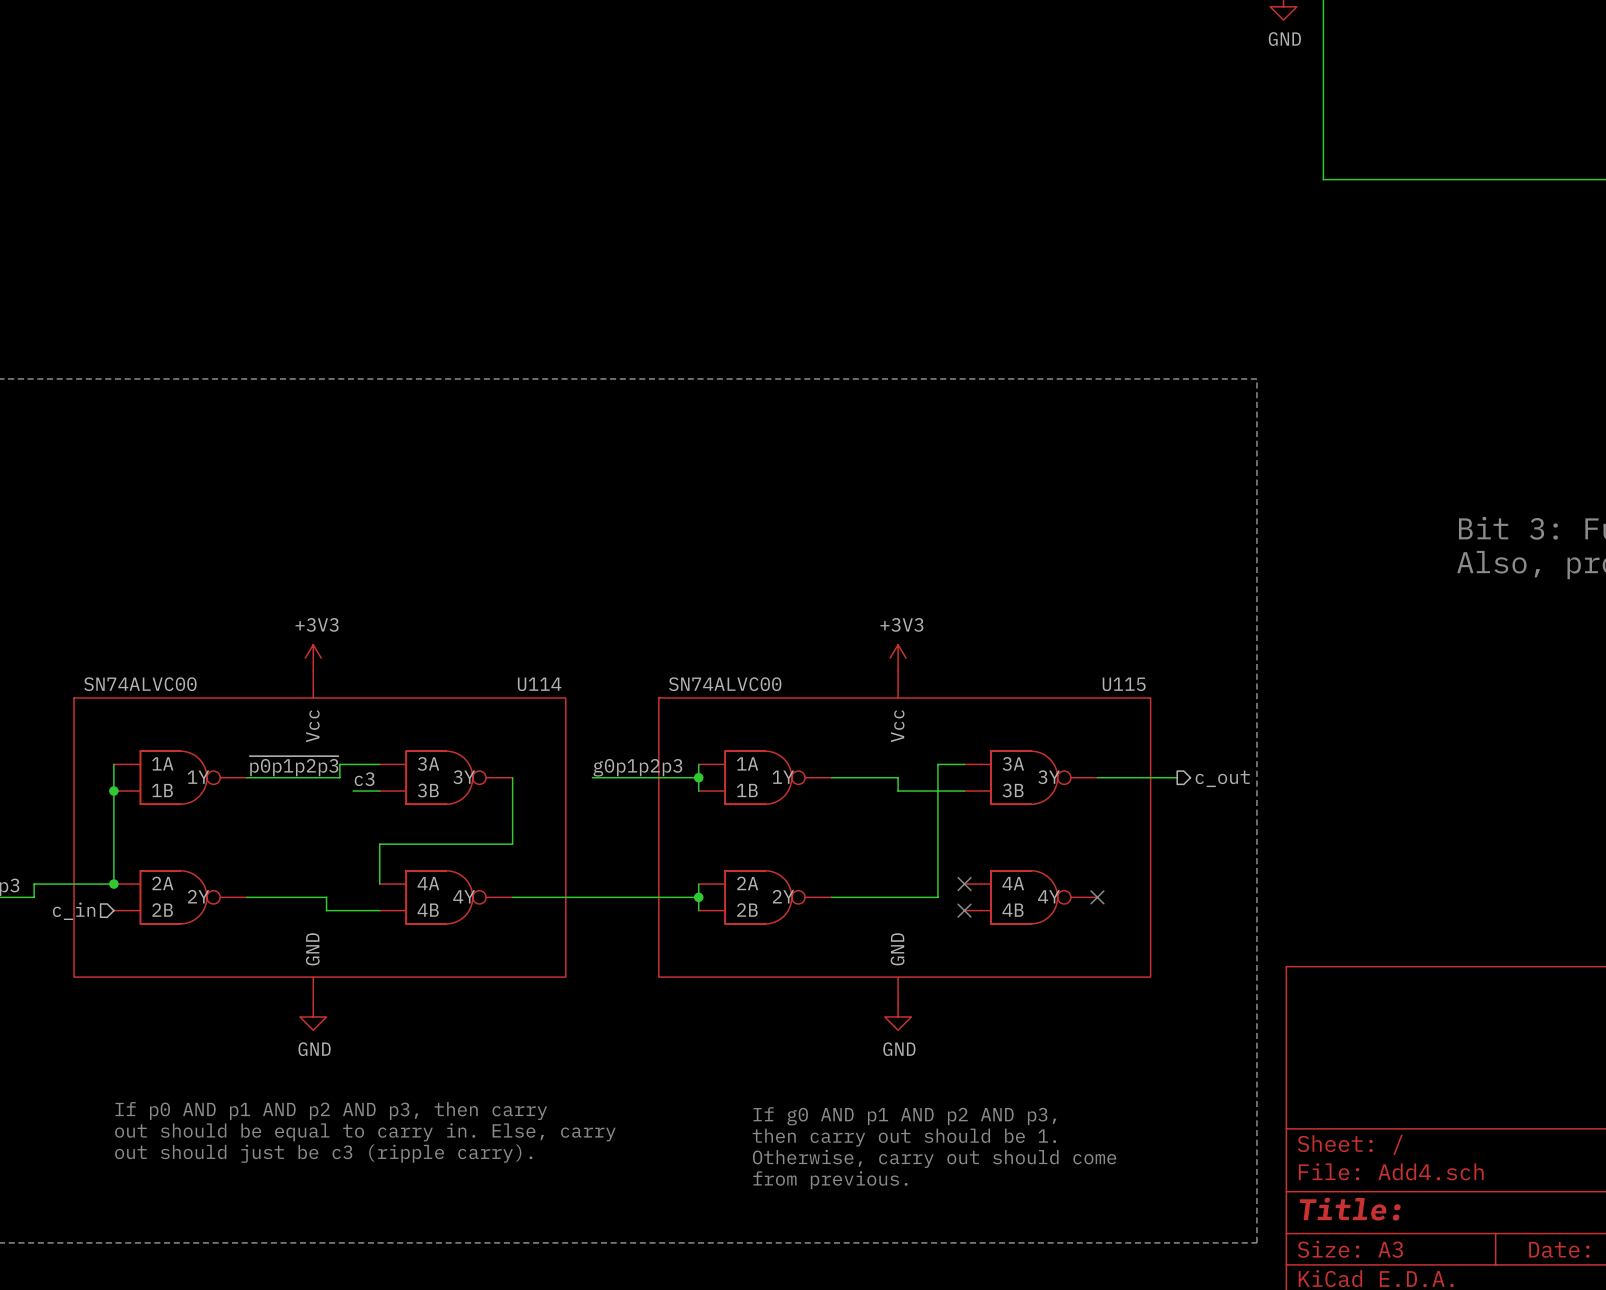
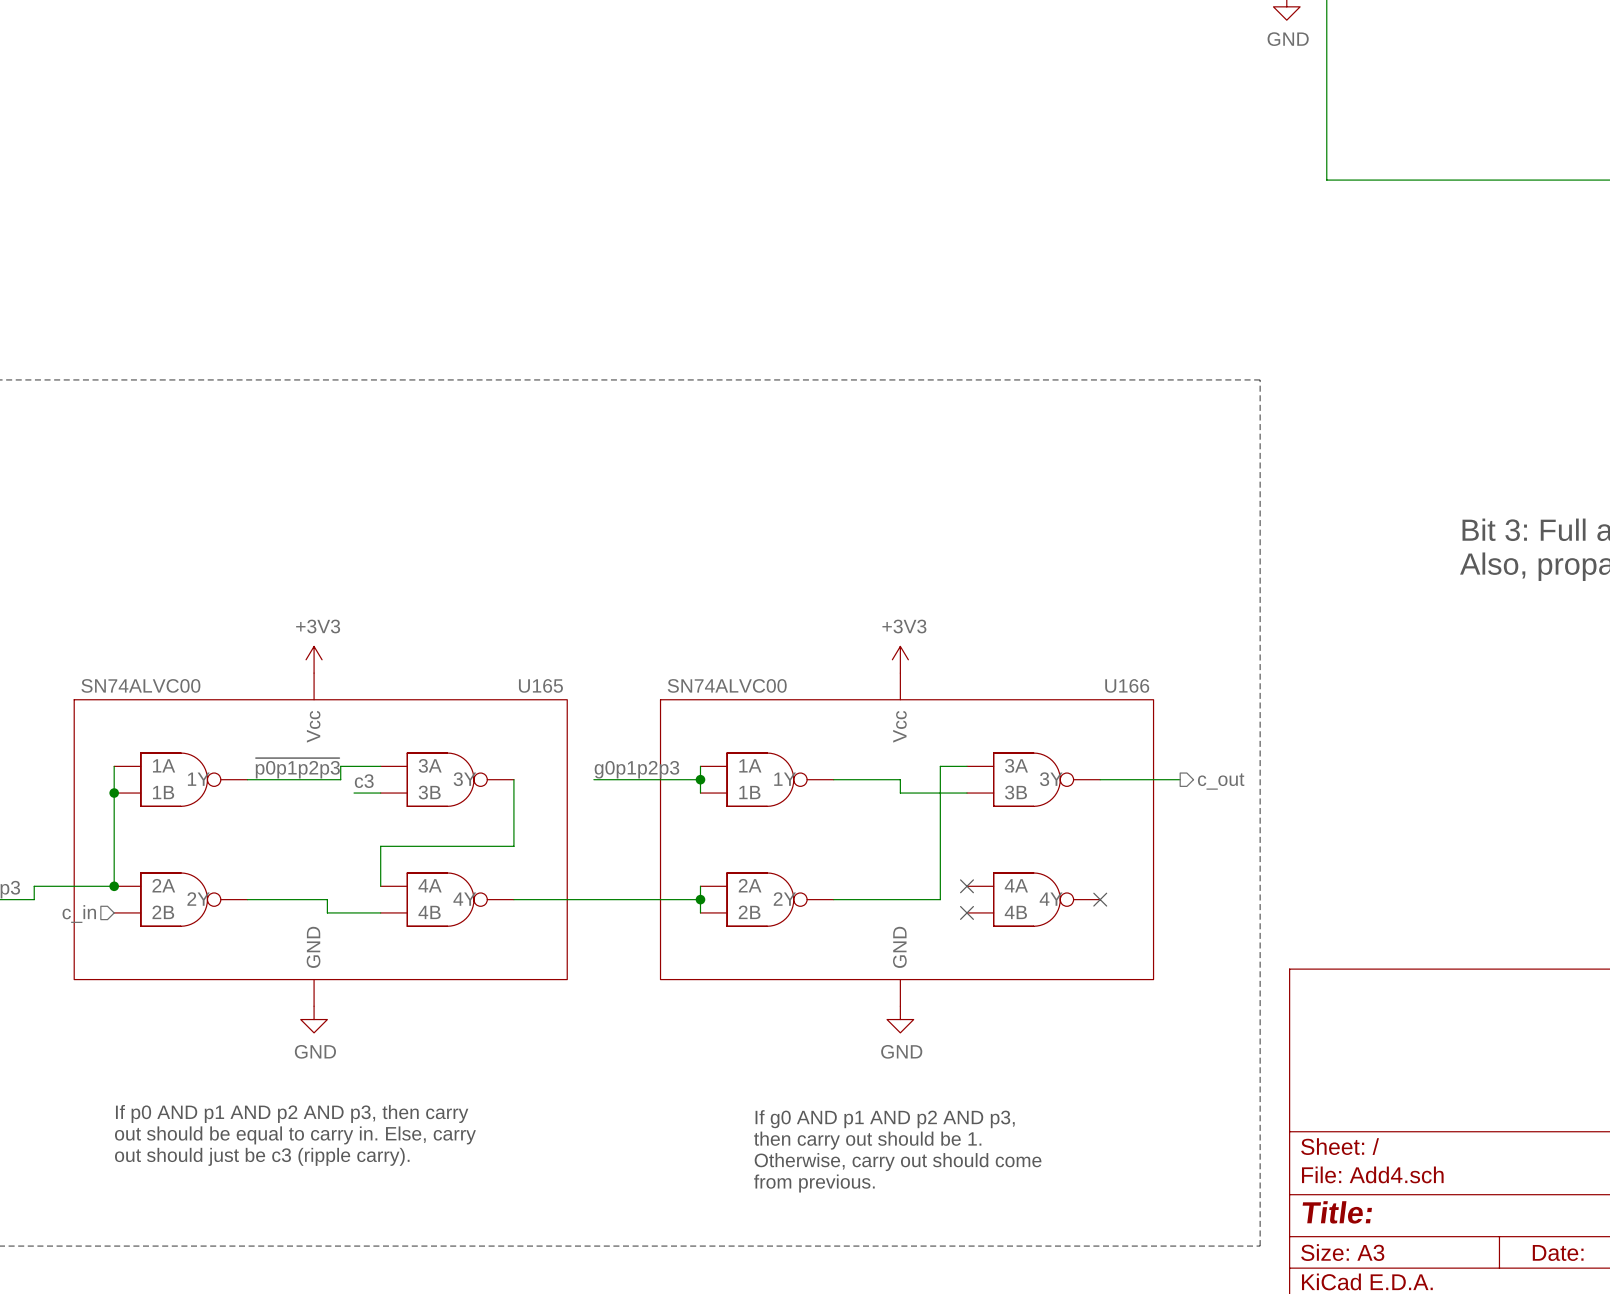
U114 name: U114 (539, 684) -> U165 (540, 685)
U115 name: U115 (1124, 684) -> U166 (1127, 685)

